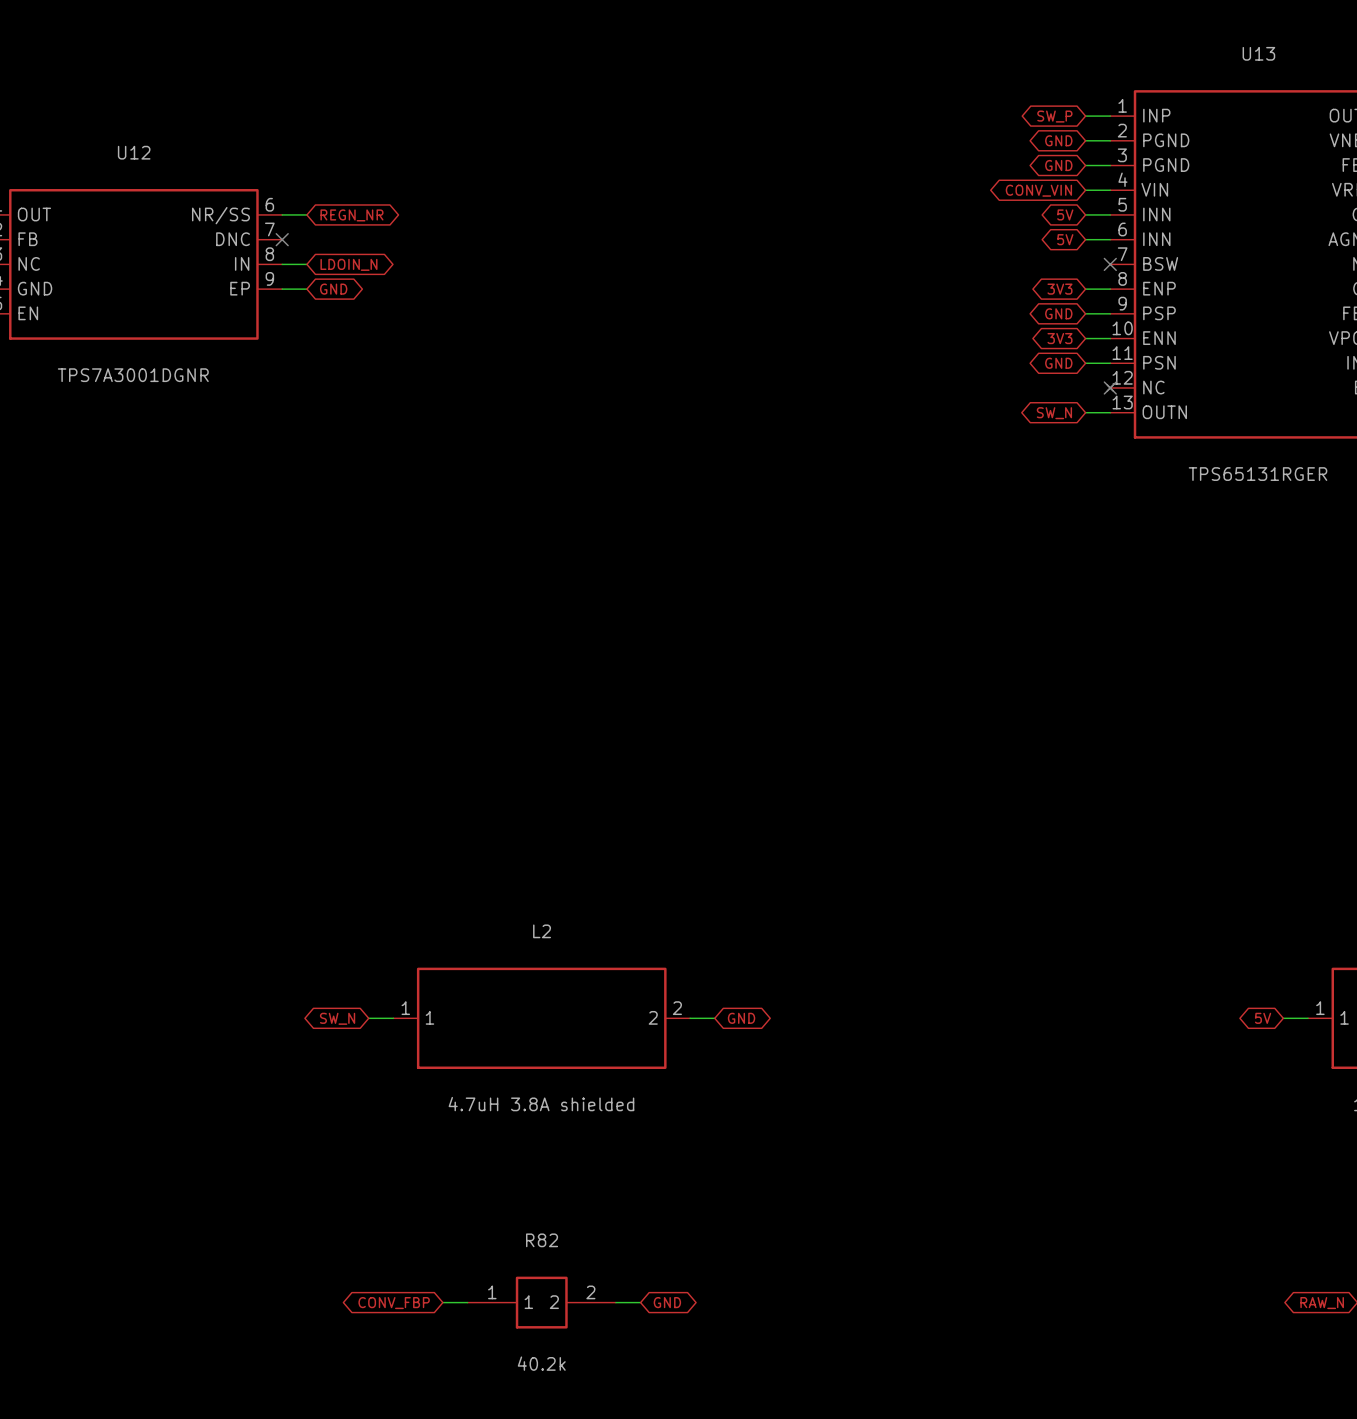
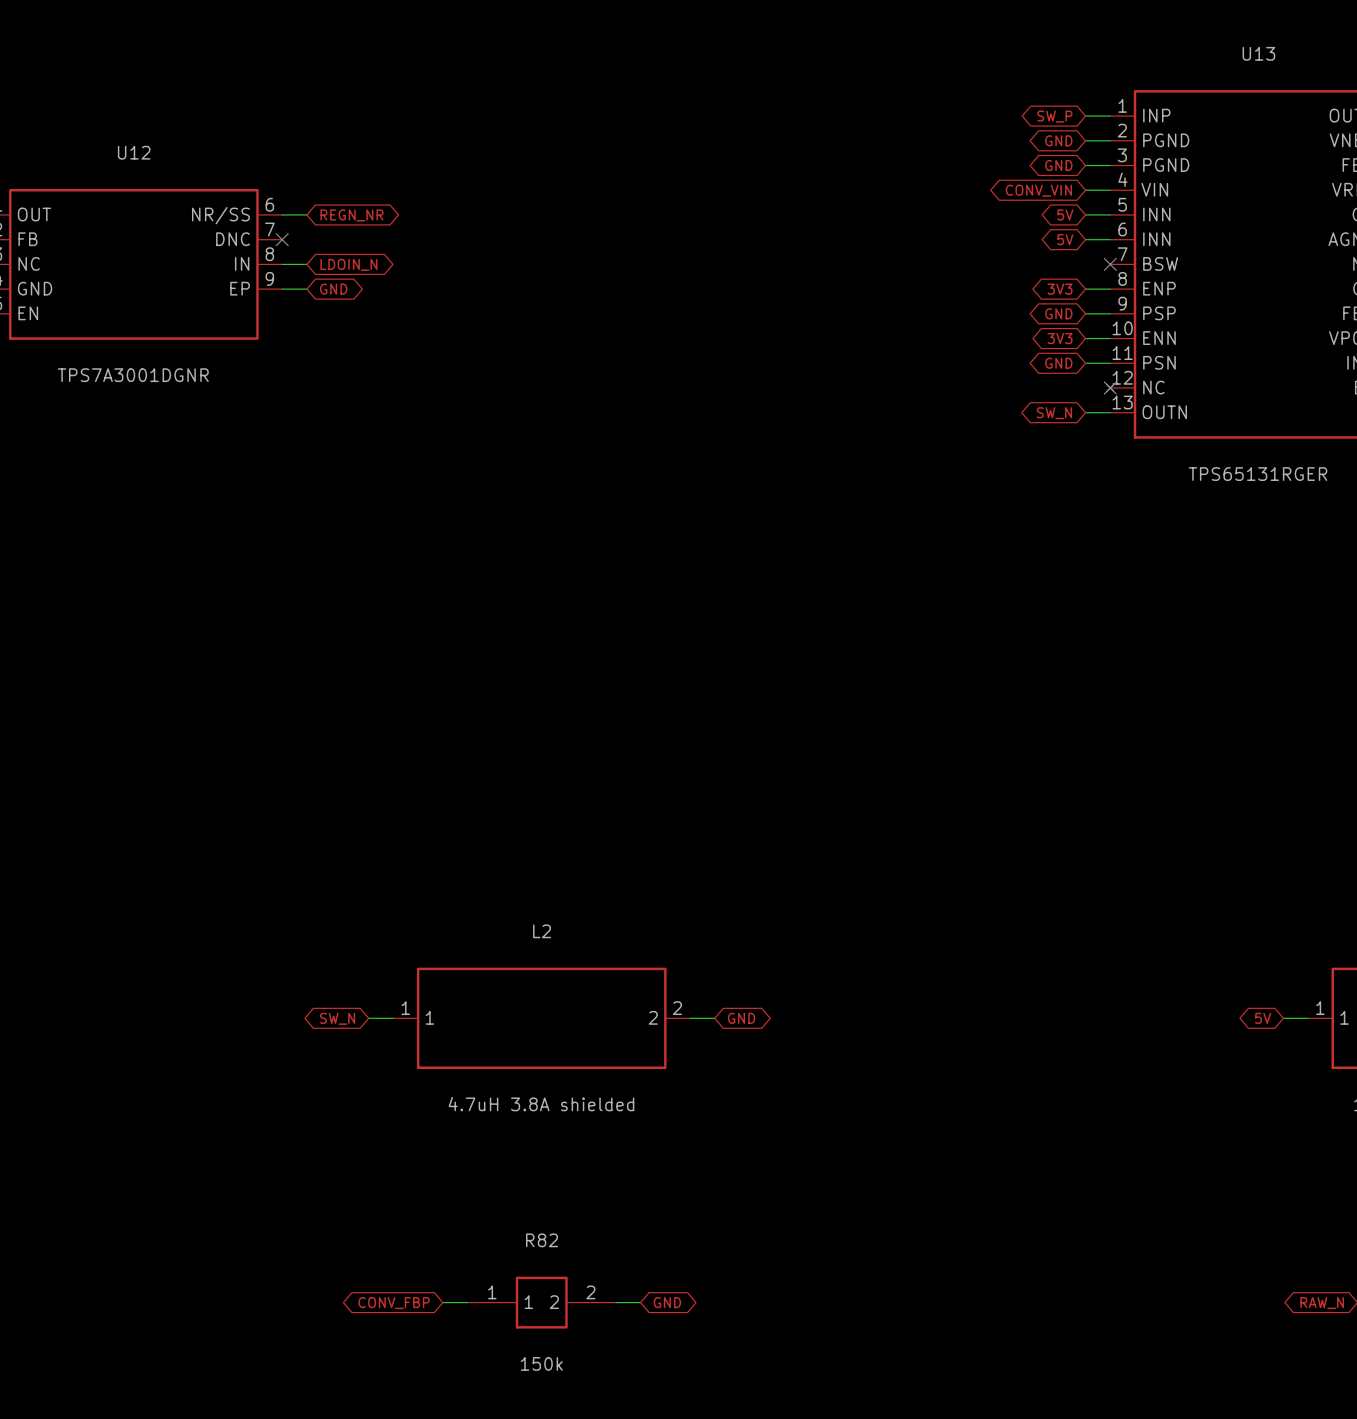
R82 value: 40.2k (541, 1363) -> 150k (541, 1363)

